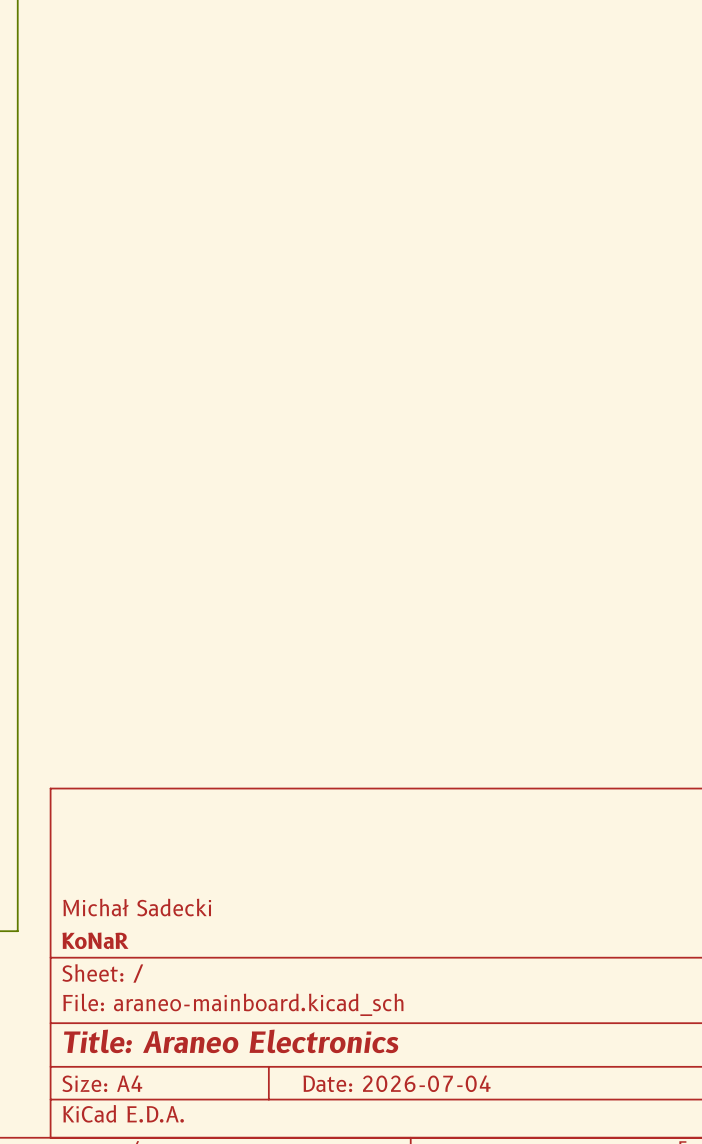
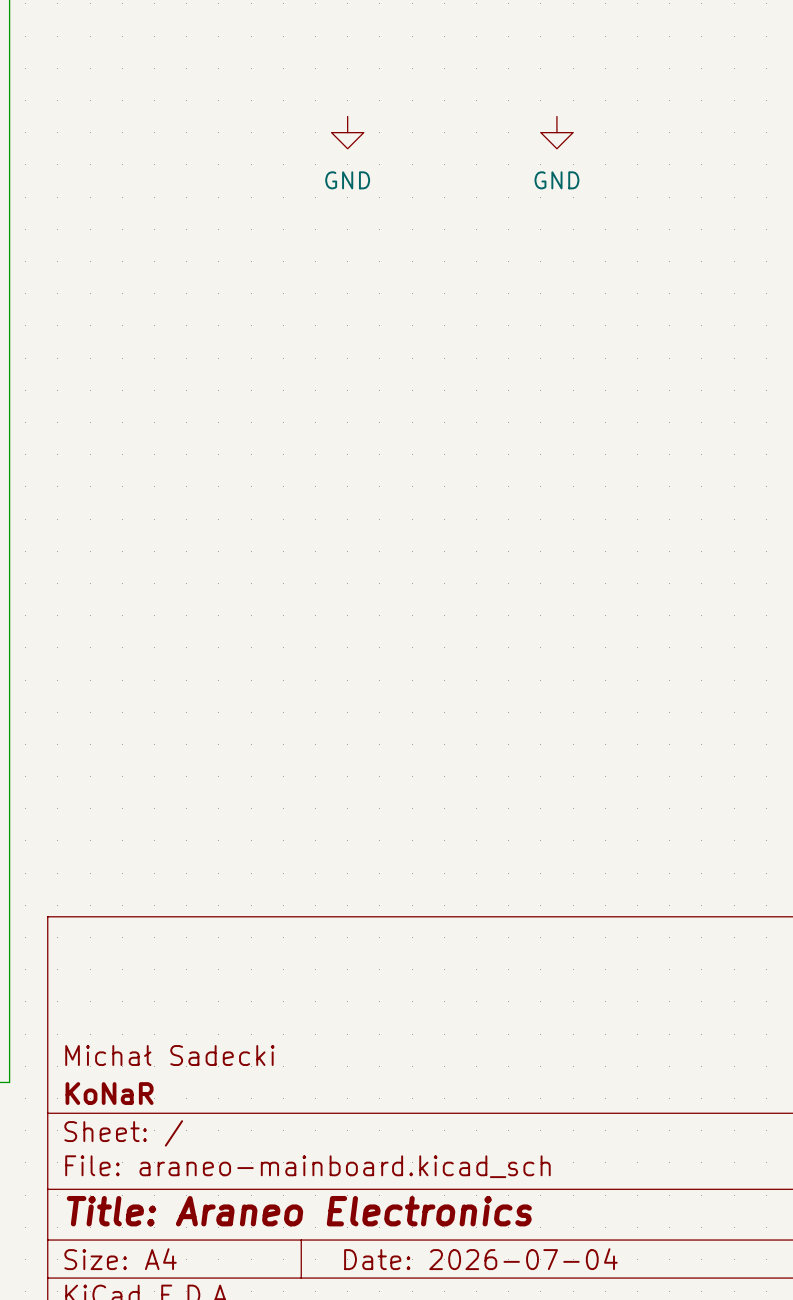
power symbol: none -> GND (347, 132)
power symbol: none -> GND (556, 132)

